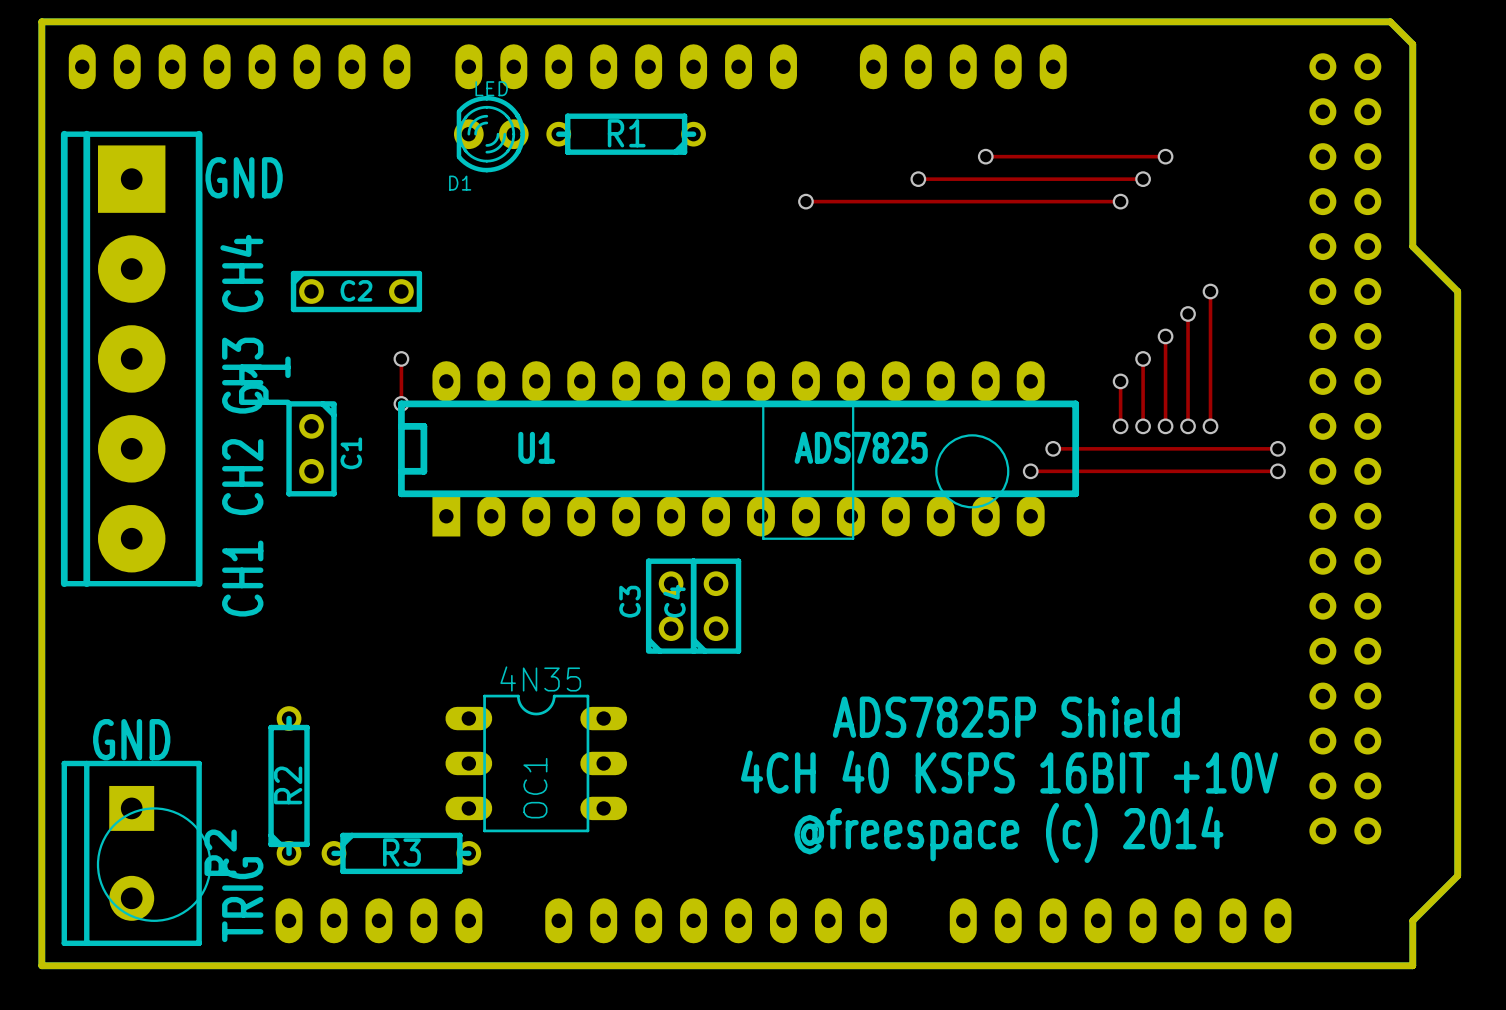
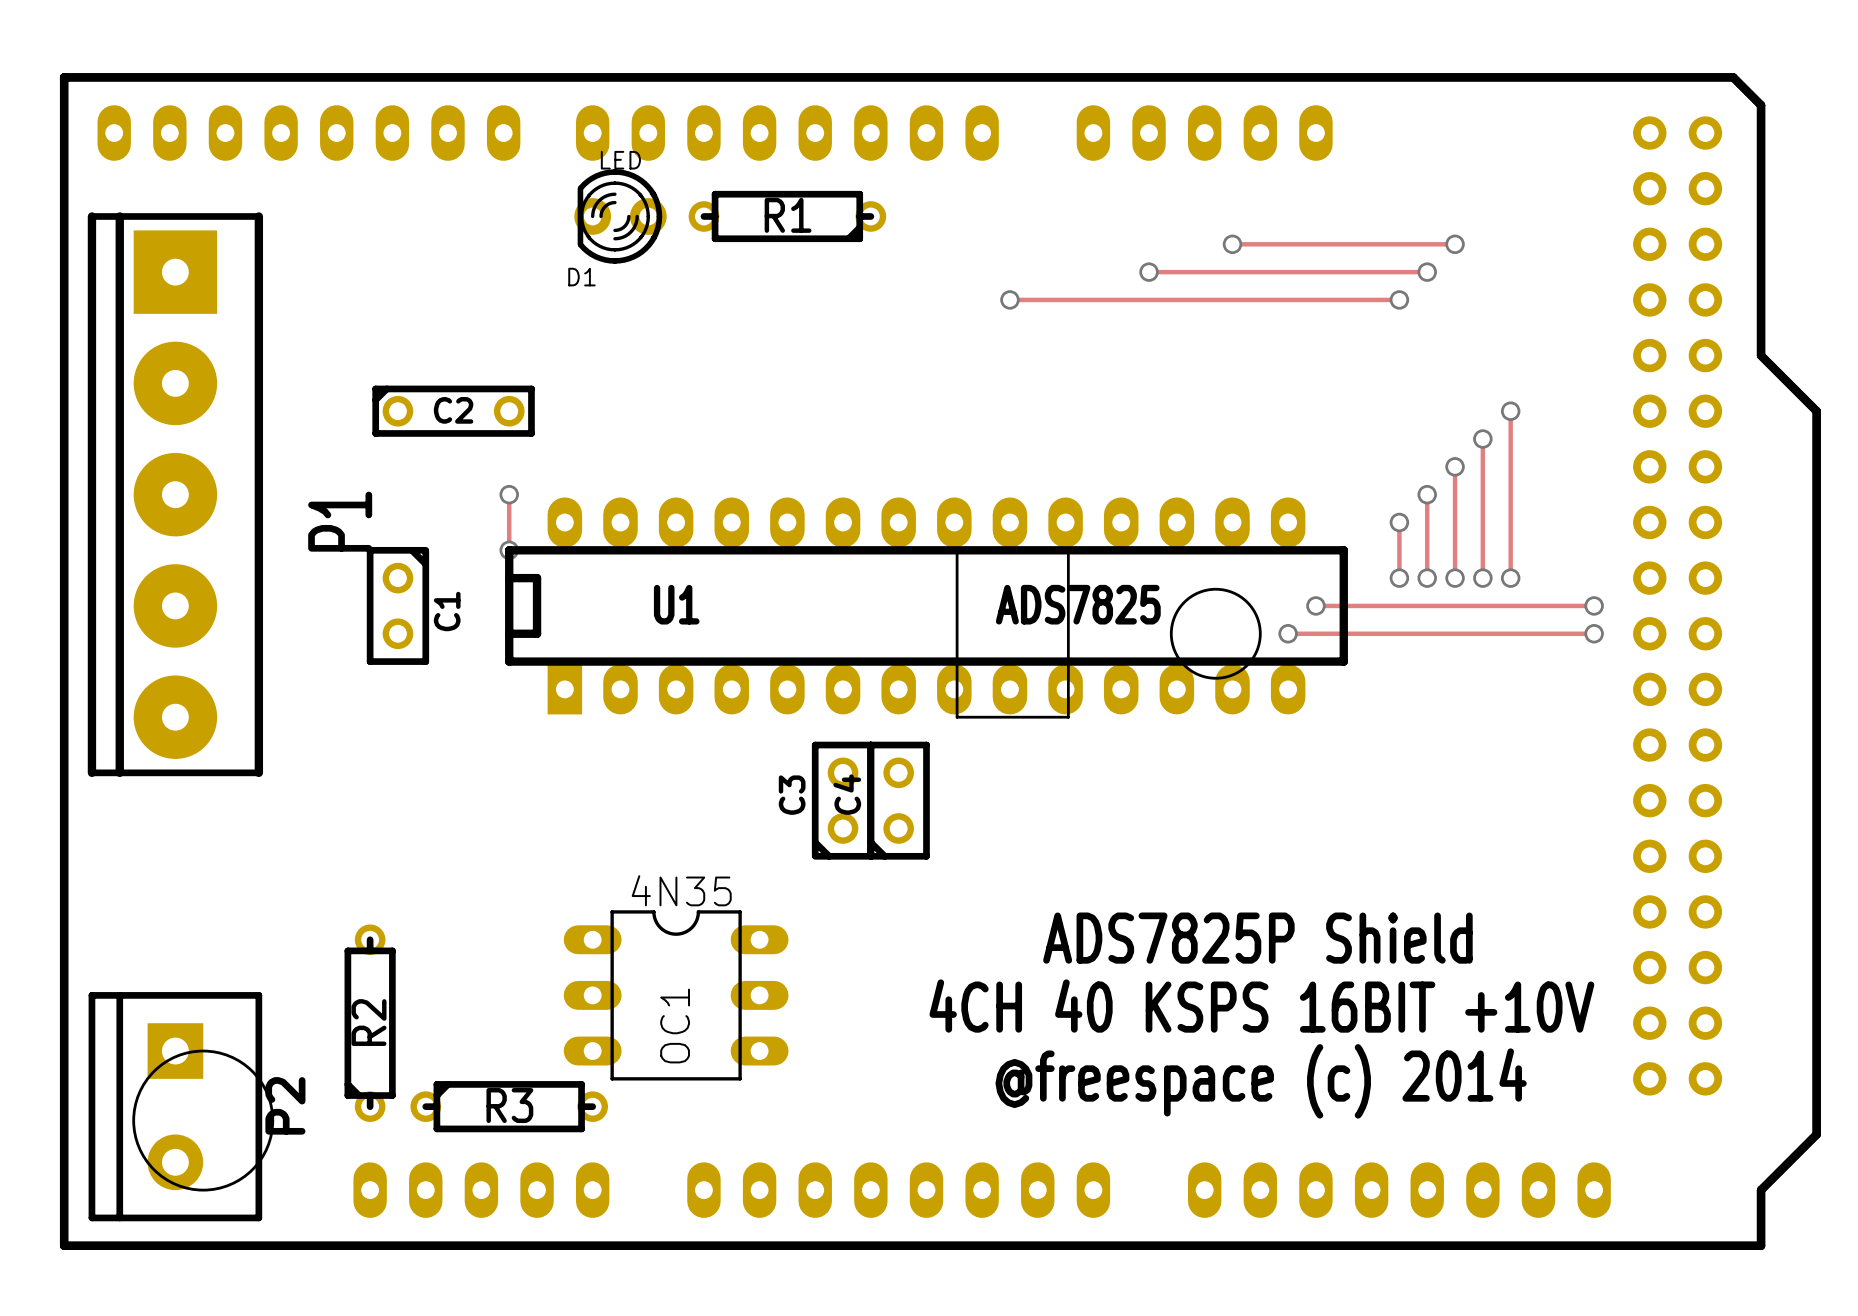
text: GND (244, 177) -> none
text: CH1 CH2 CH3 CH4 (241, 425) -> none
text: GND (131, 739) -> none
text: TRIG (242, 899) -> none

